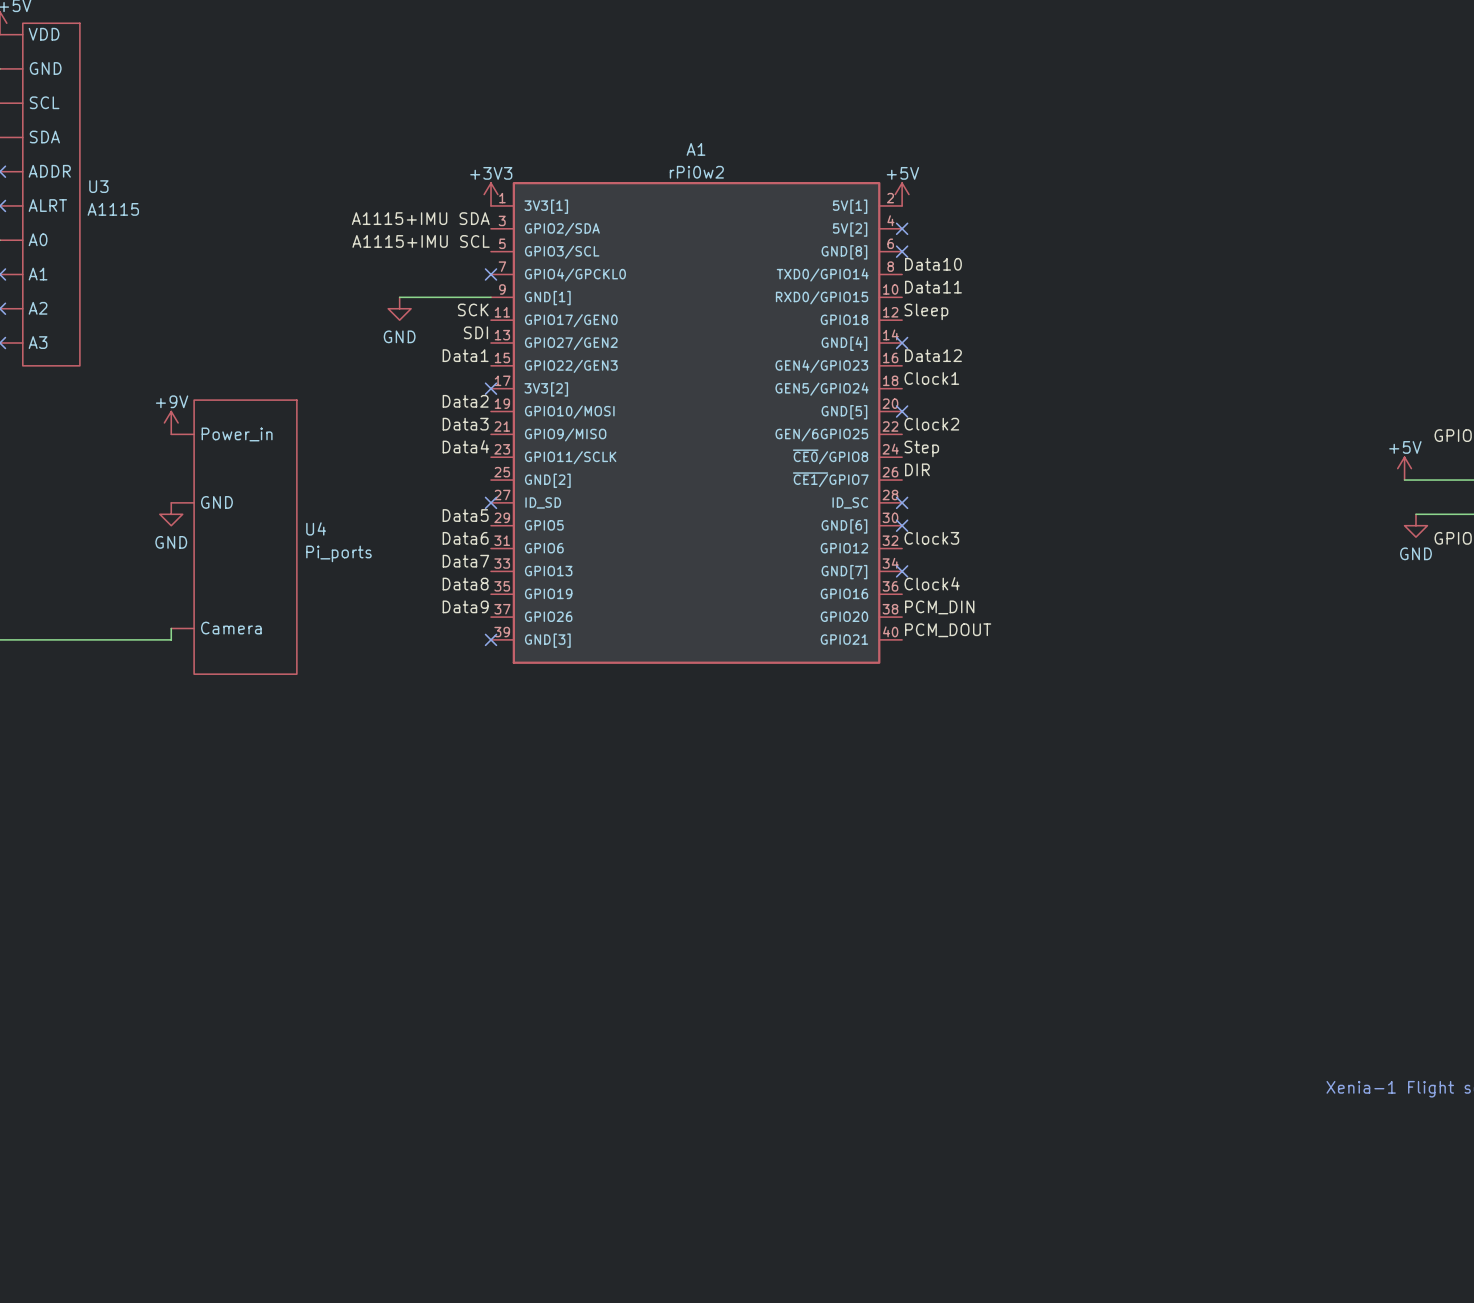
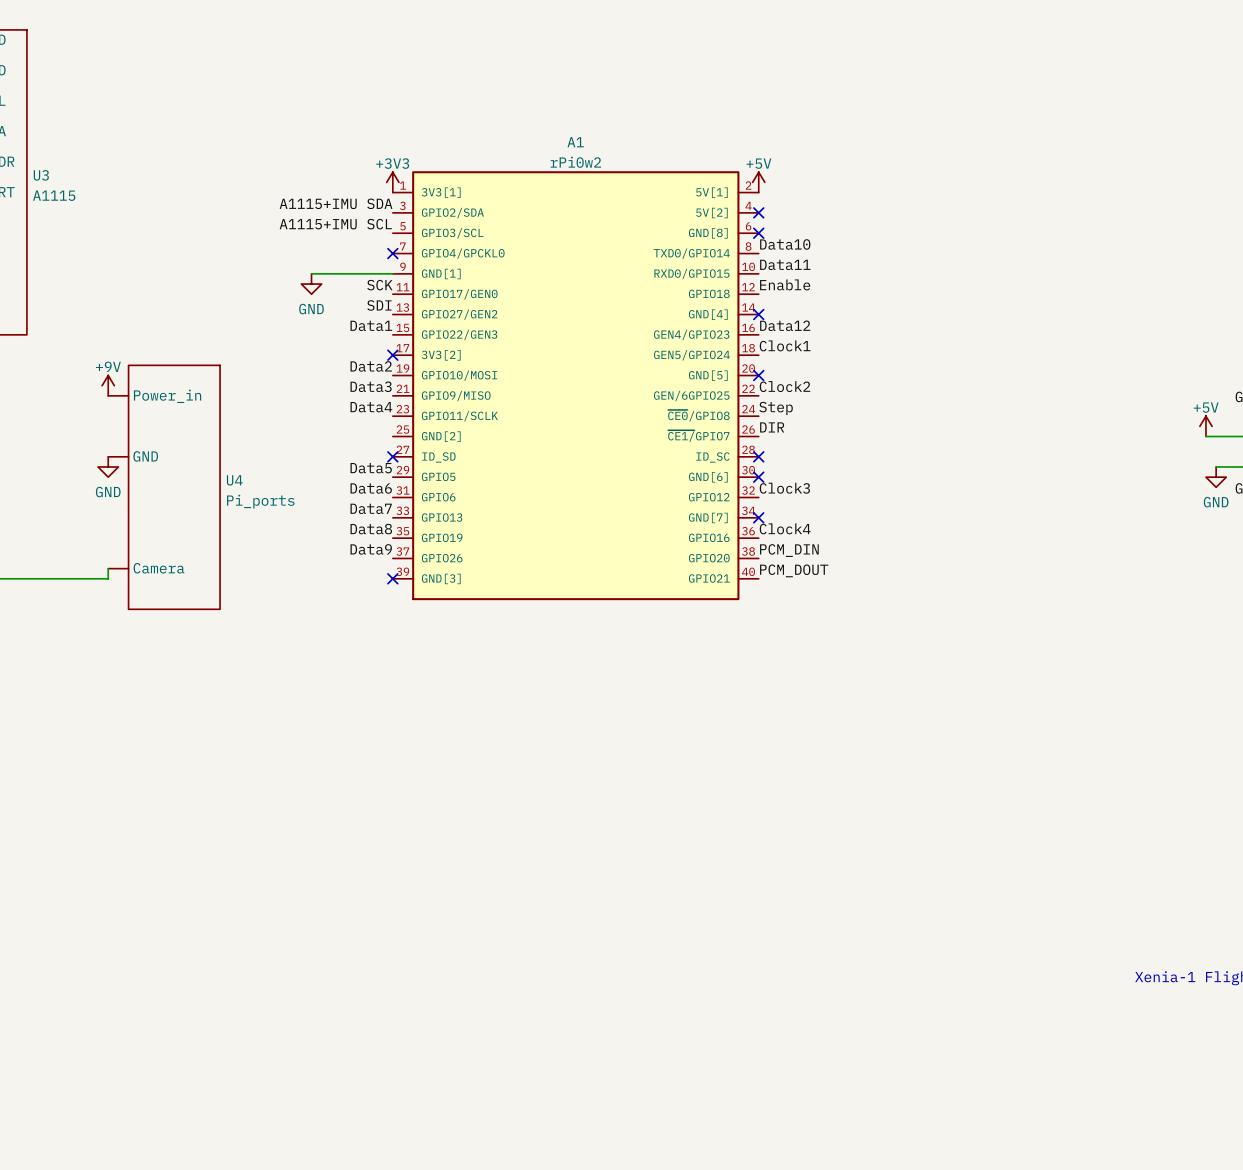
label: Sleep (926, 311) -> Enable (785, 284)

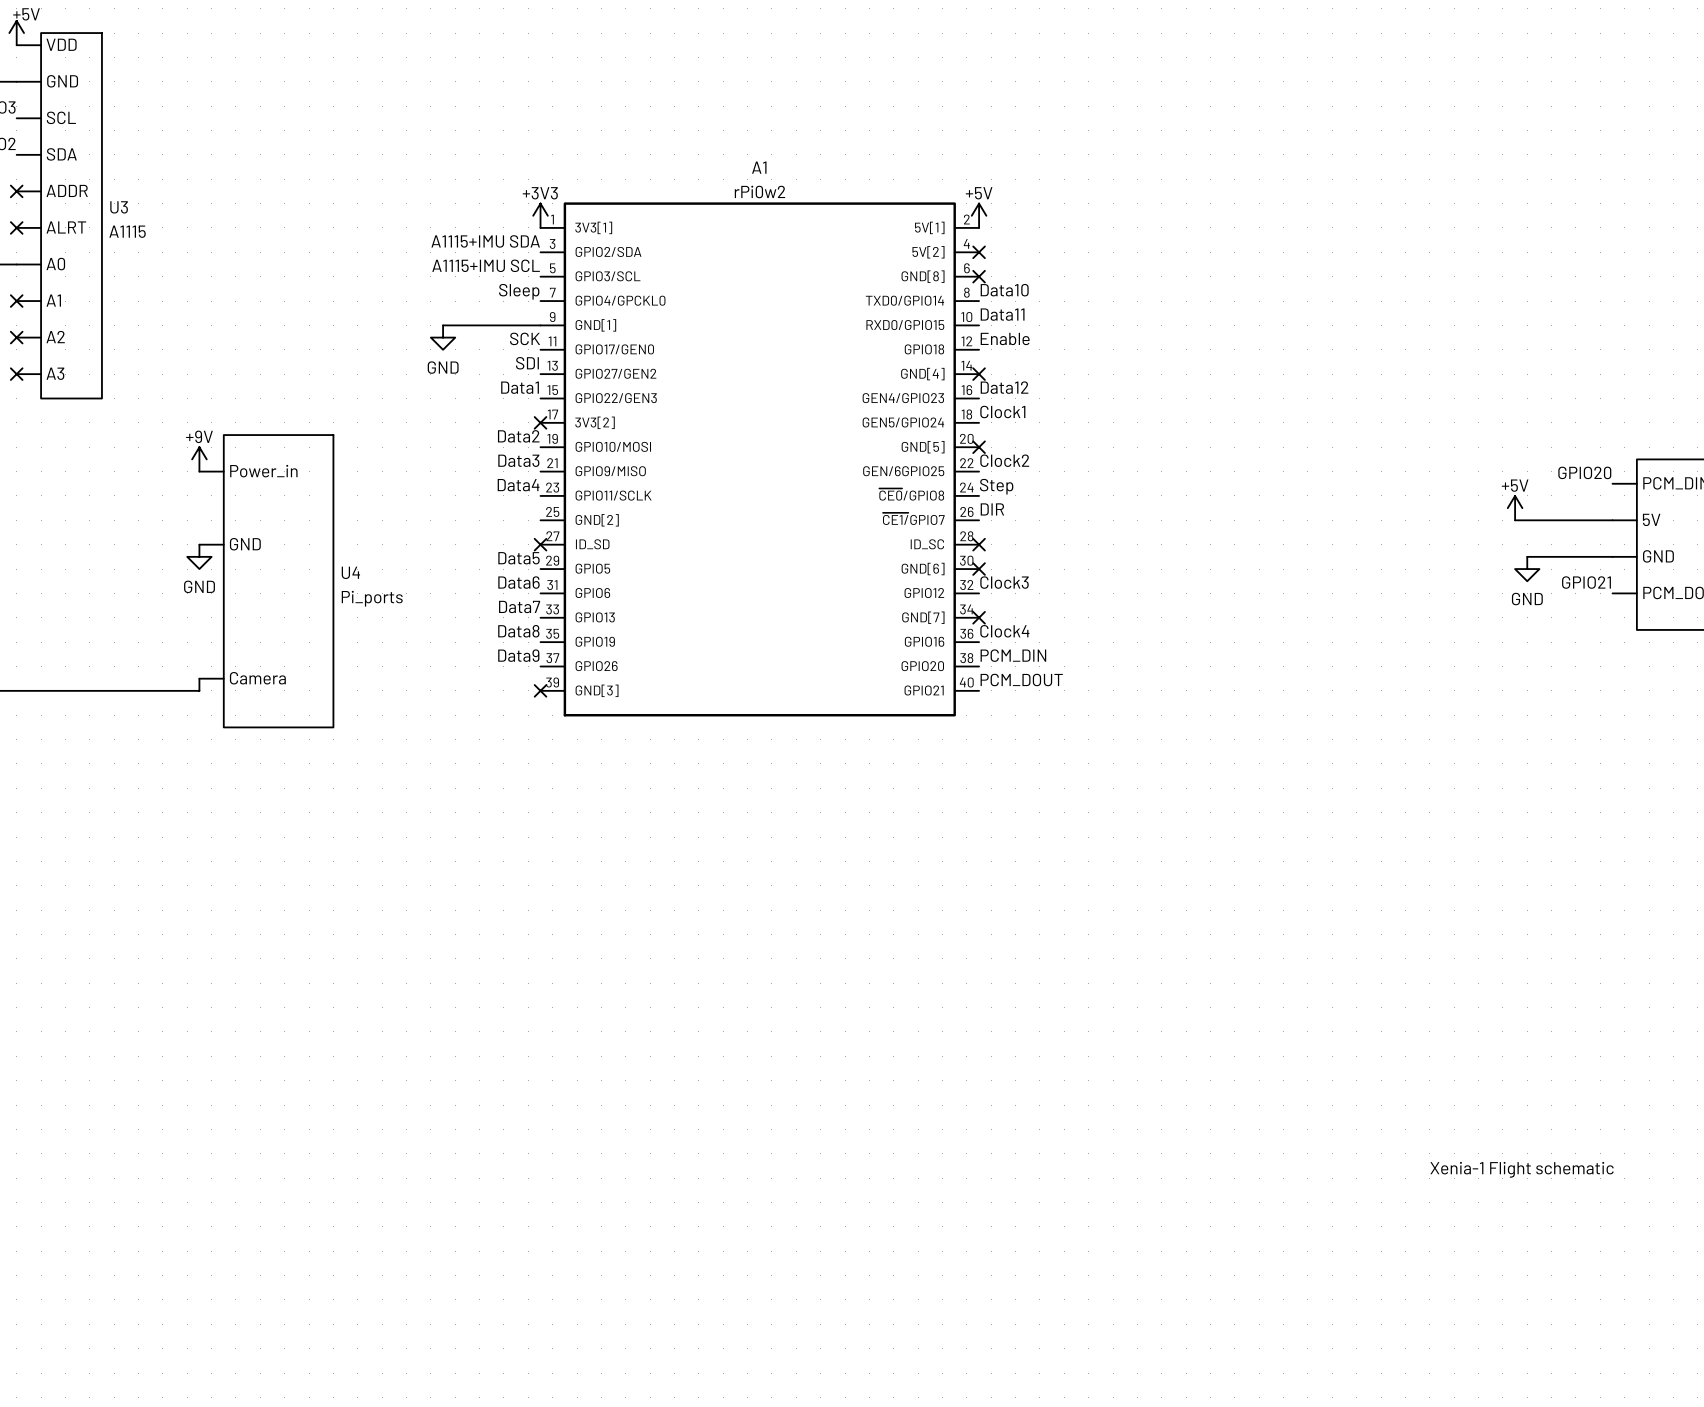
label: none -> Sleep (519, 291)
no-connect mark: (392, 253) -> none

